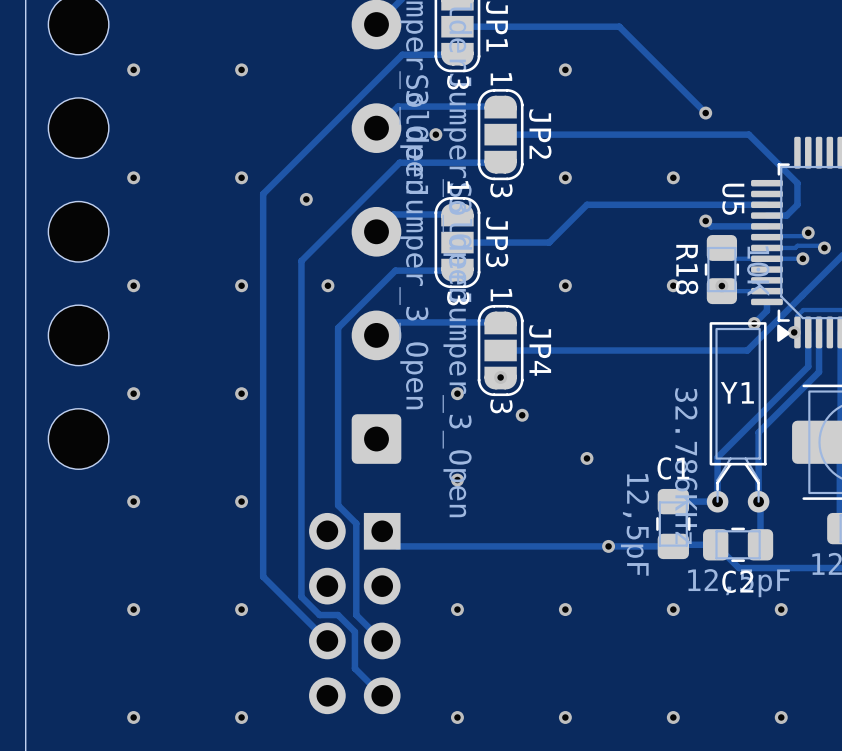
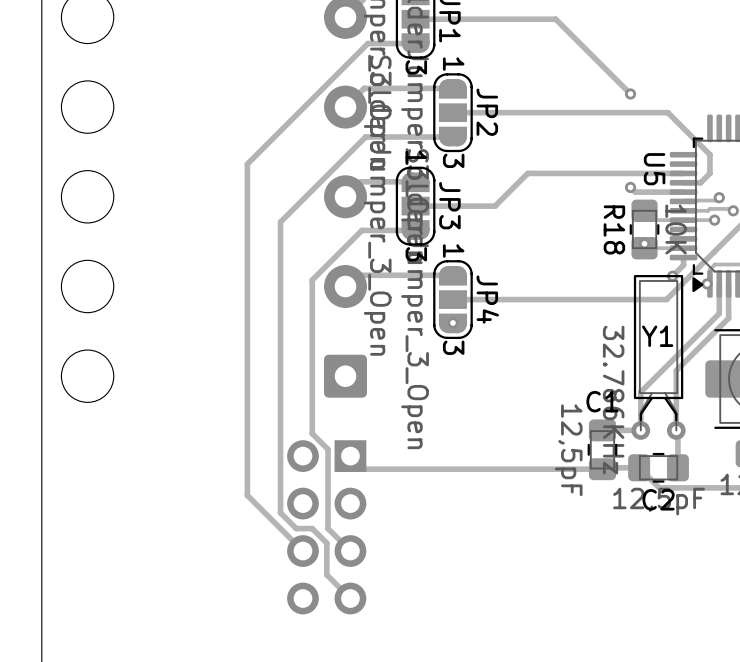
via: (133, 69) -> none
via: (241, 69) -> none
via: (565, 69) -> none
via: (435, 134) -> none
via: (133, 177) -> none
via: (241, 177) -> none
via: (565, 177) -> none
via: (673, 177) -> none
via: (306, 199) -> none
via: (133, 285) -> none
via: (241, 285) -> none
via: (327, 285) -> none
via: (565, 285) -> none
via: (673, 285) -> none
via: (133, 393) -> none
via: (241, 393) -> none
via: (457, 393) -> none
via: (522, 415) -> none
via: (586, 458) -> none
via: (457, 480) -> none
via: (133, 501) -> none
via: (241, 501) -> none
via: (608, 546) -> none
via: (133, 609) -> none
via: (241, 609) -> none
via: (457, 609) -> none
via: (565, 609) -> none
via: (673, 609) -> none
via: (781, 609) -> none
via: (133, 717) -> none
via: (241, 717) -> none
via: (457, 717) -> none
via: (565, 717) -> none
via: (673, 717) -> none
via: (781, 717) -> none

